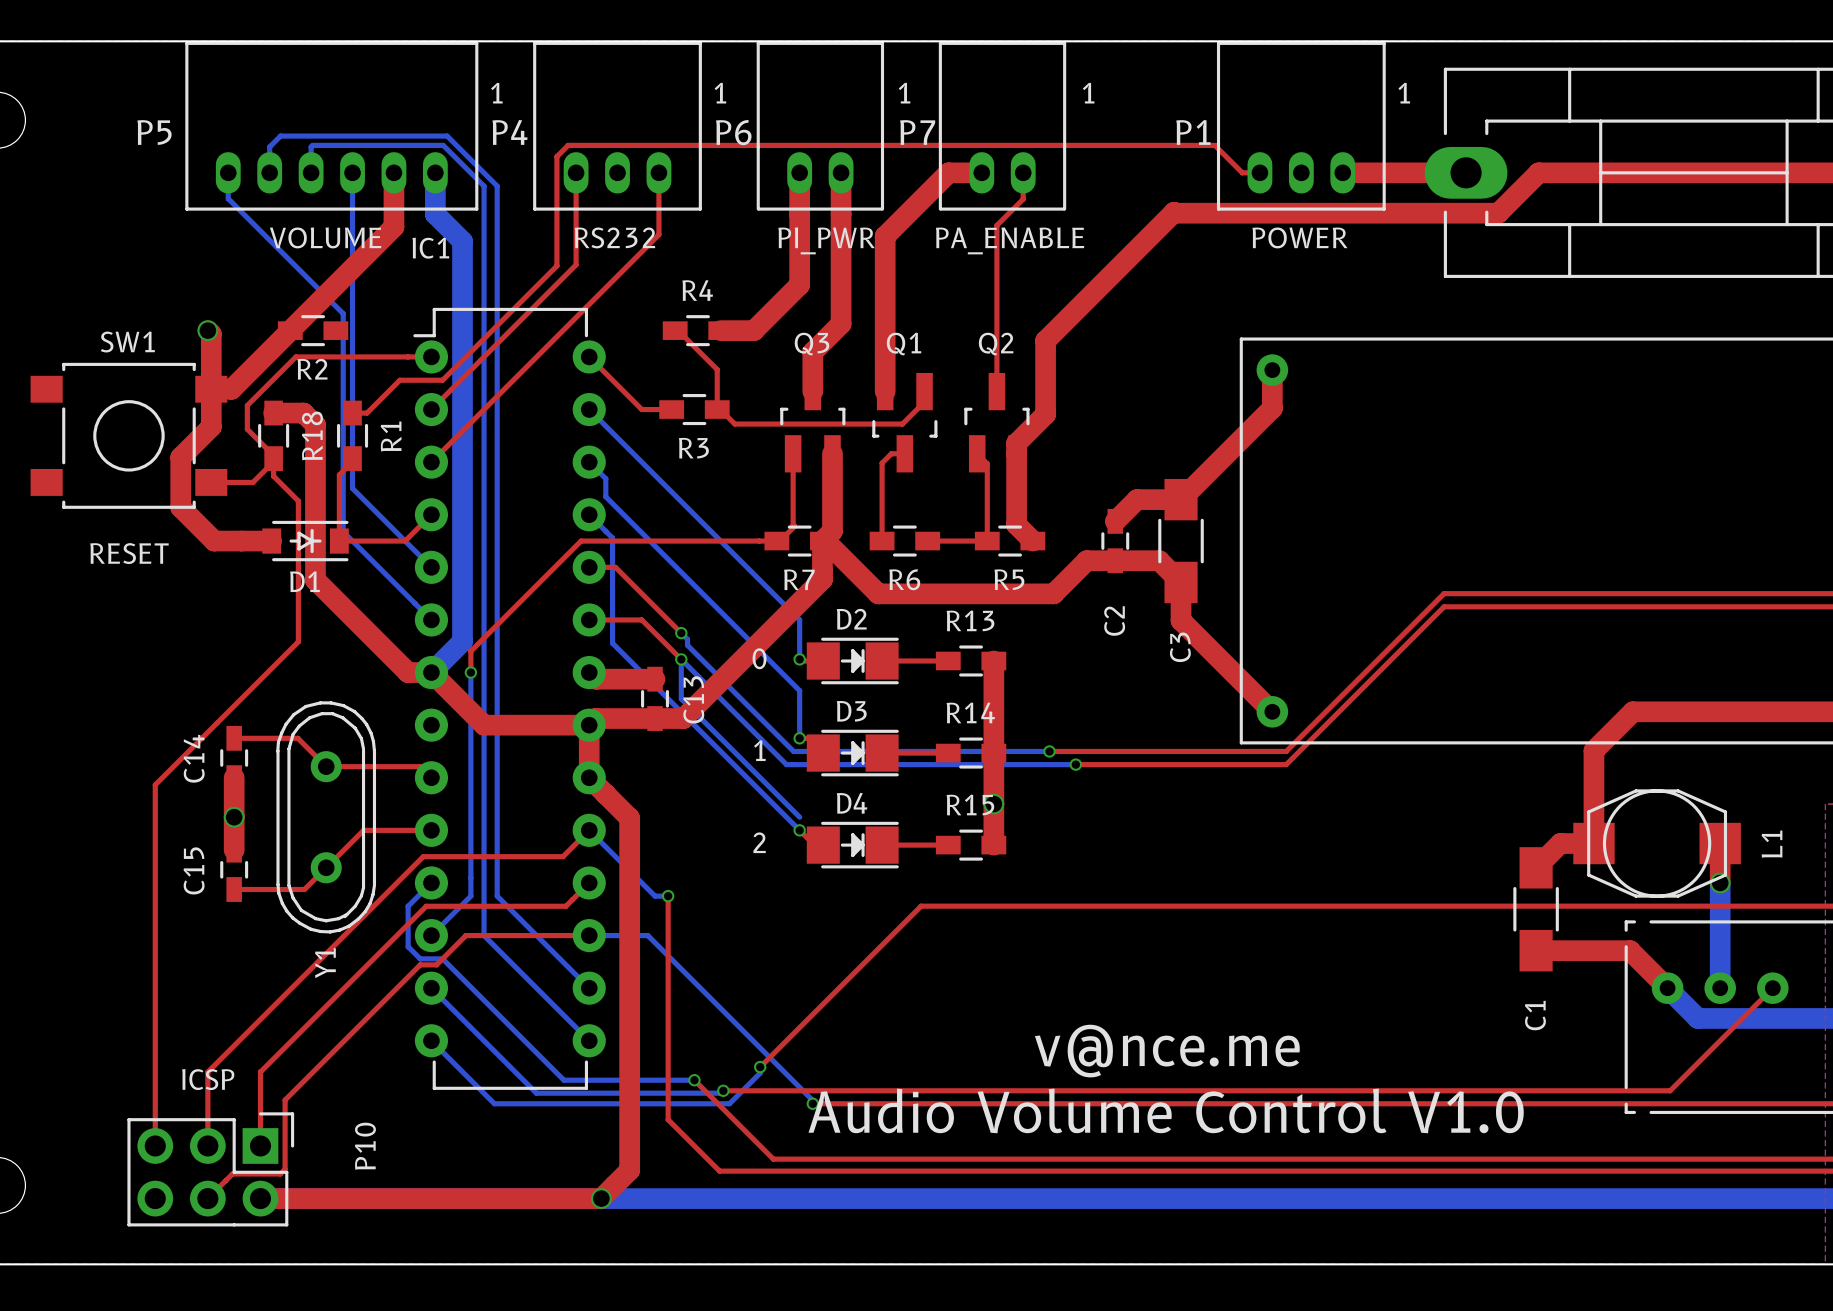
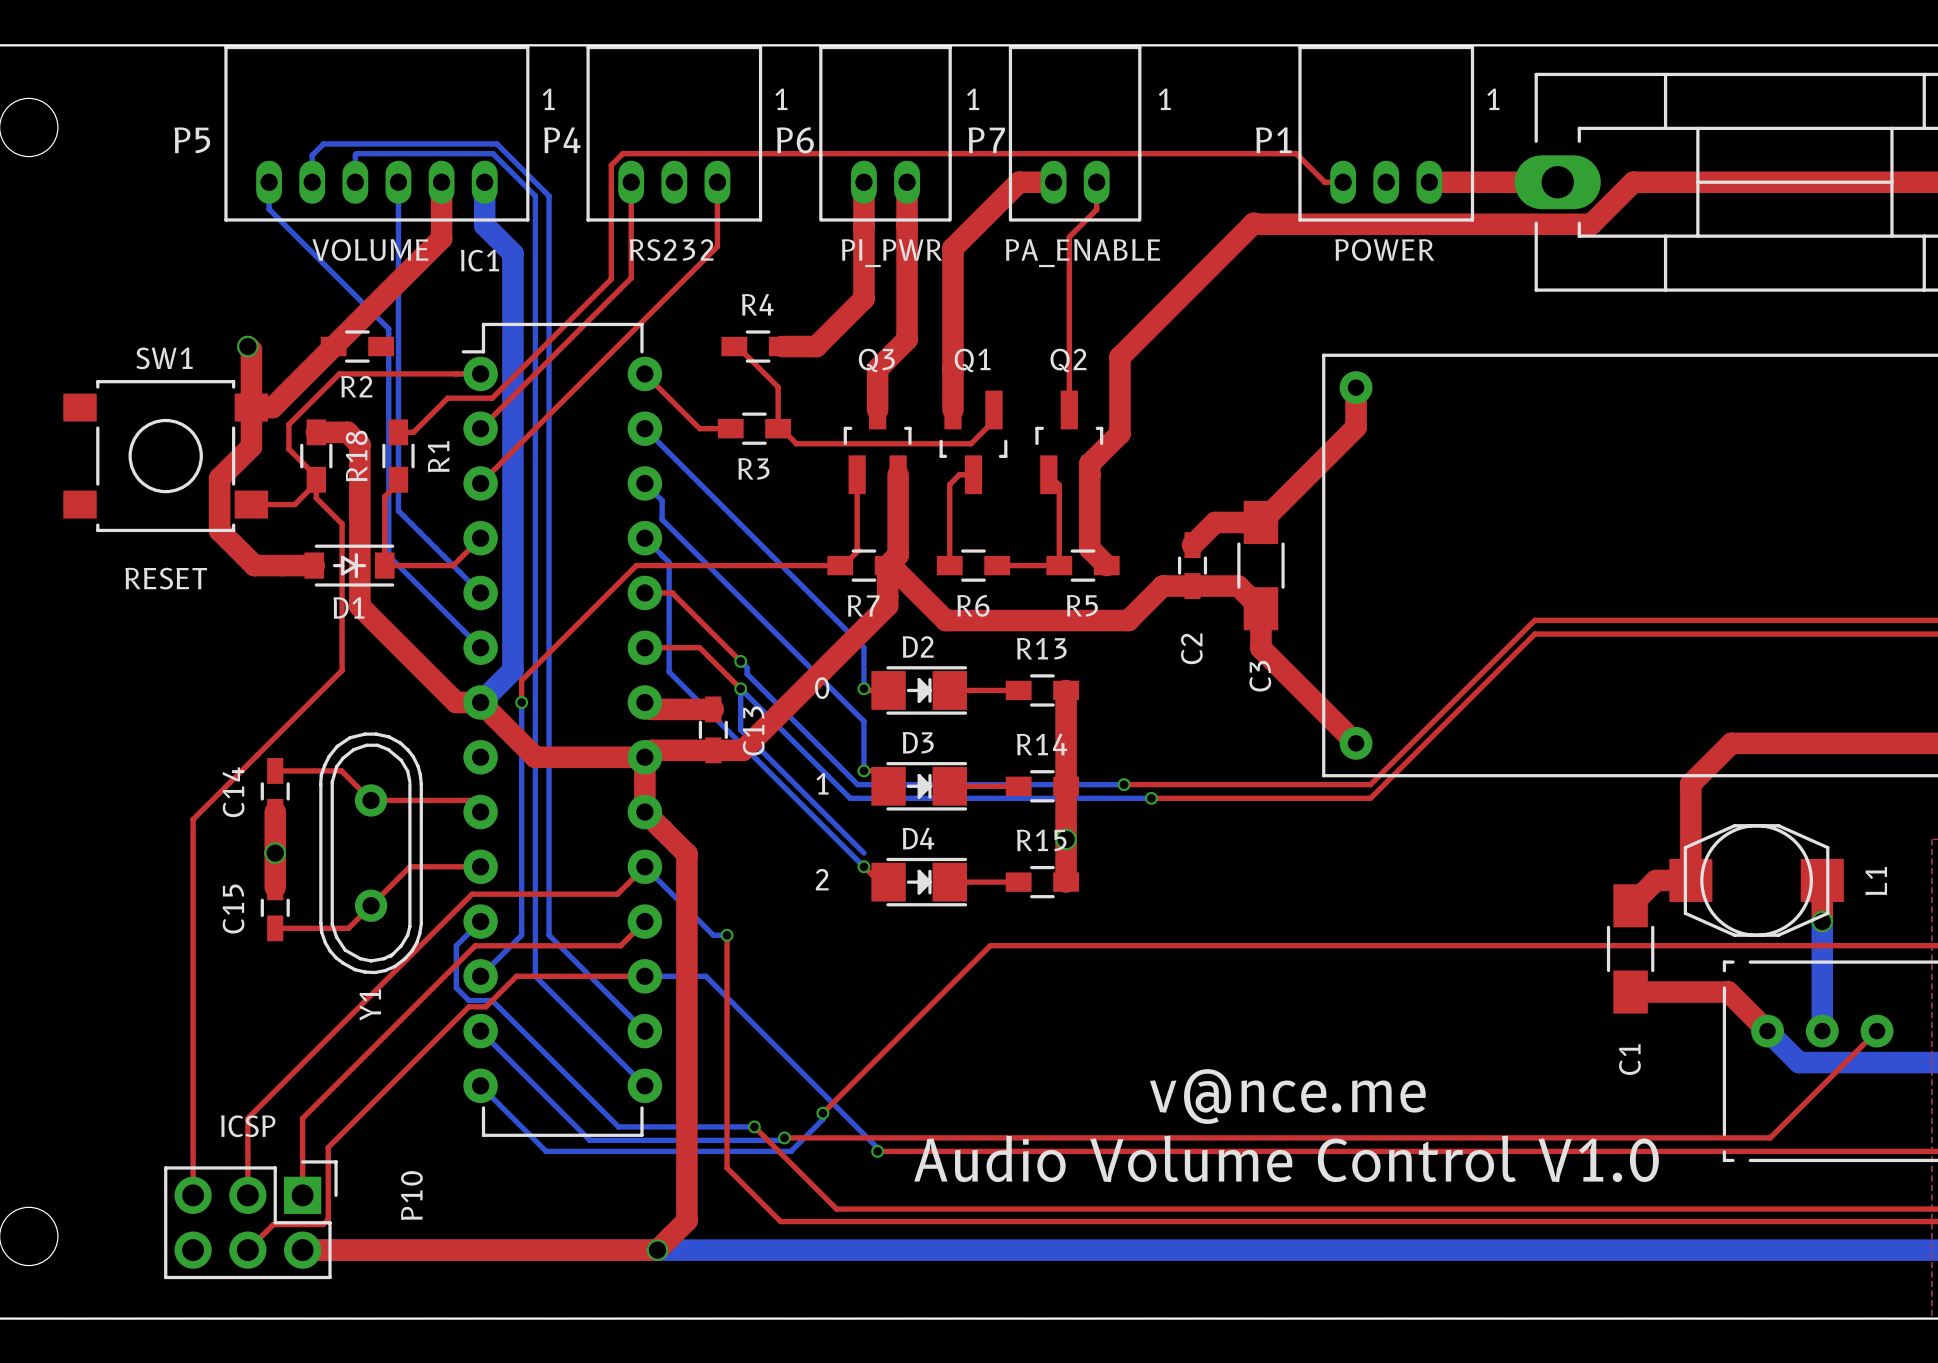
text position: v@nce.me (1167, 1051) -> v@nce.me (1287, 1096)
text position: Audio Volume Control V1.0 (1166, 1110) -> Audio Volume Control V1.0 (1286, 1158)

